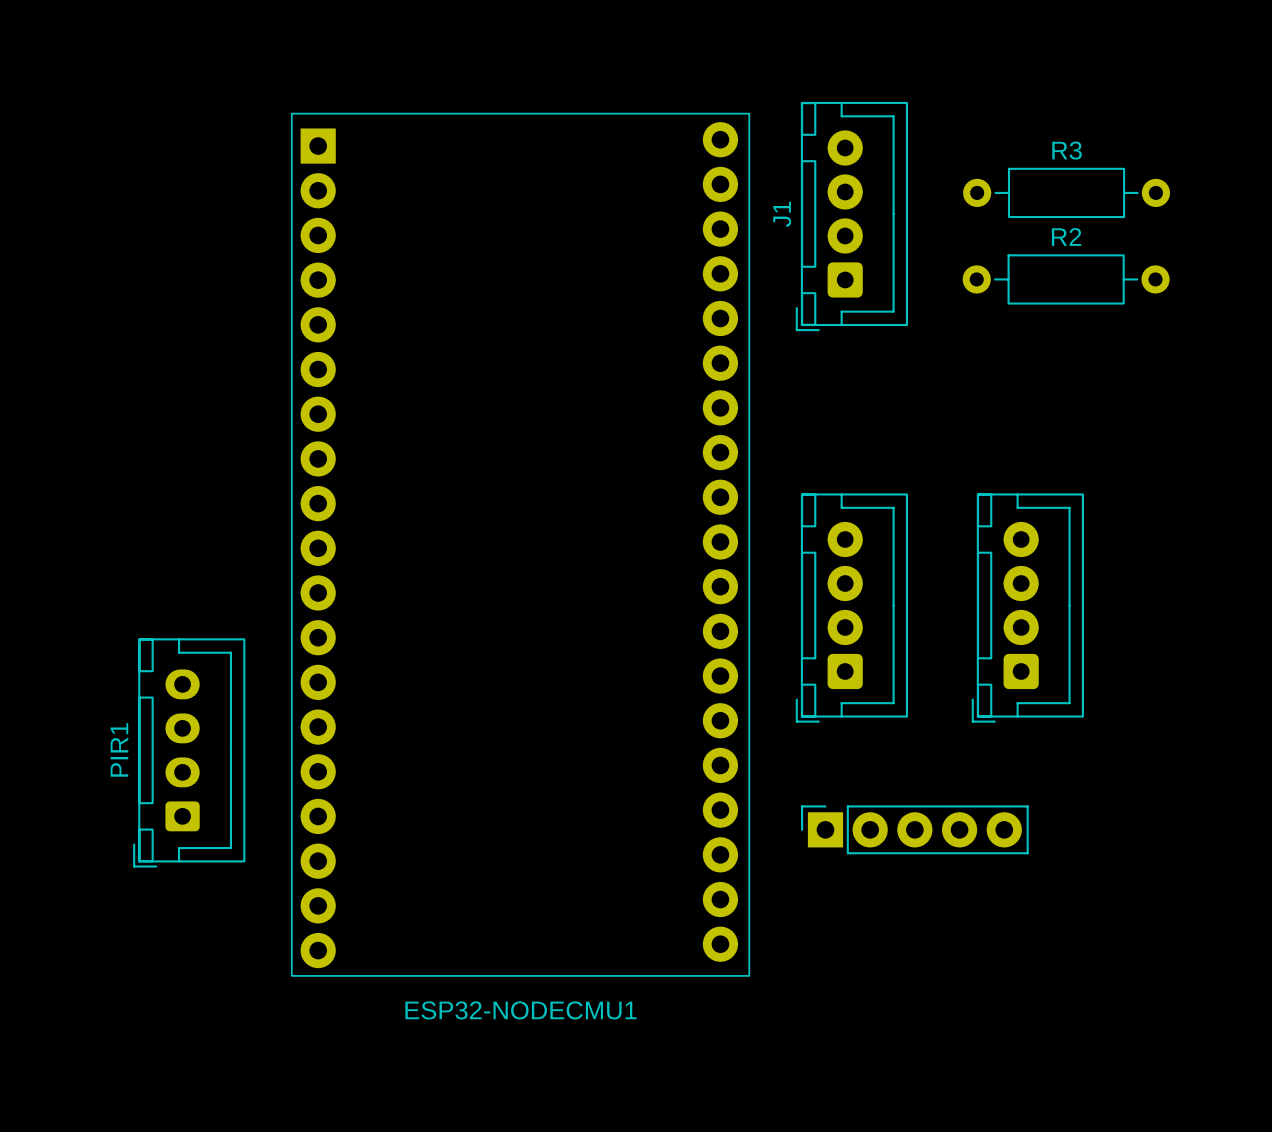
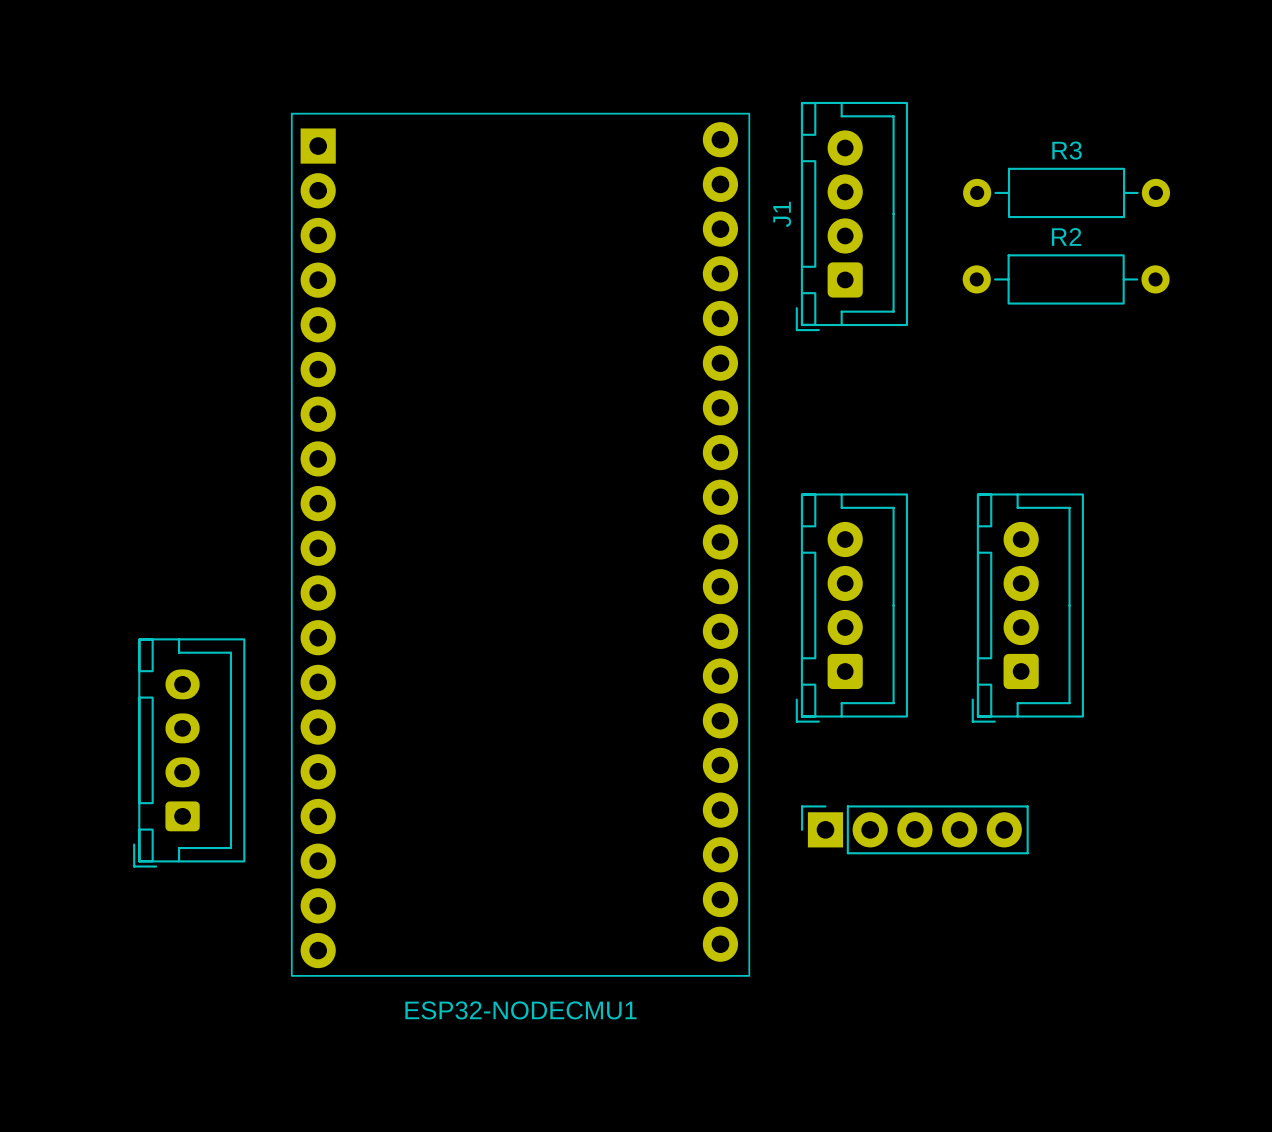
PIR1 name: PIR1 (119, 749) -> none

